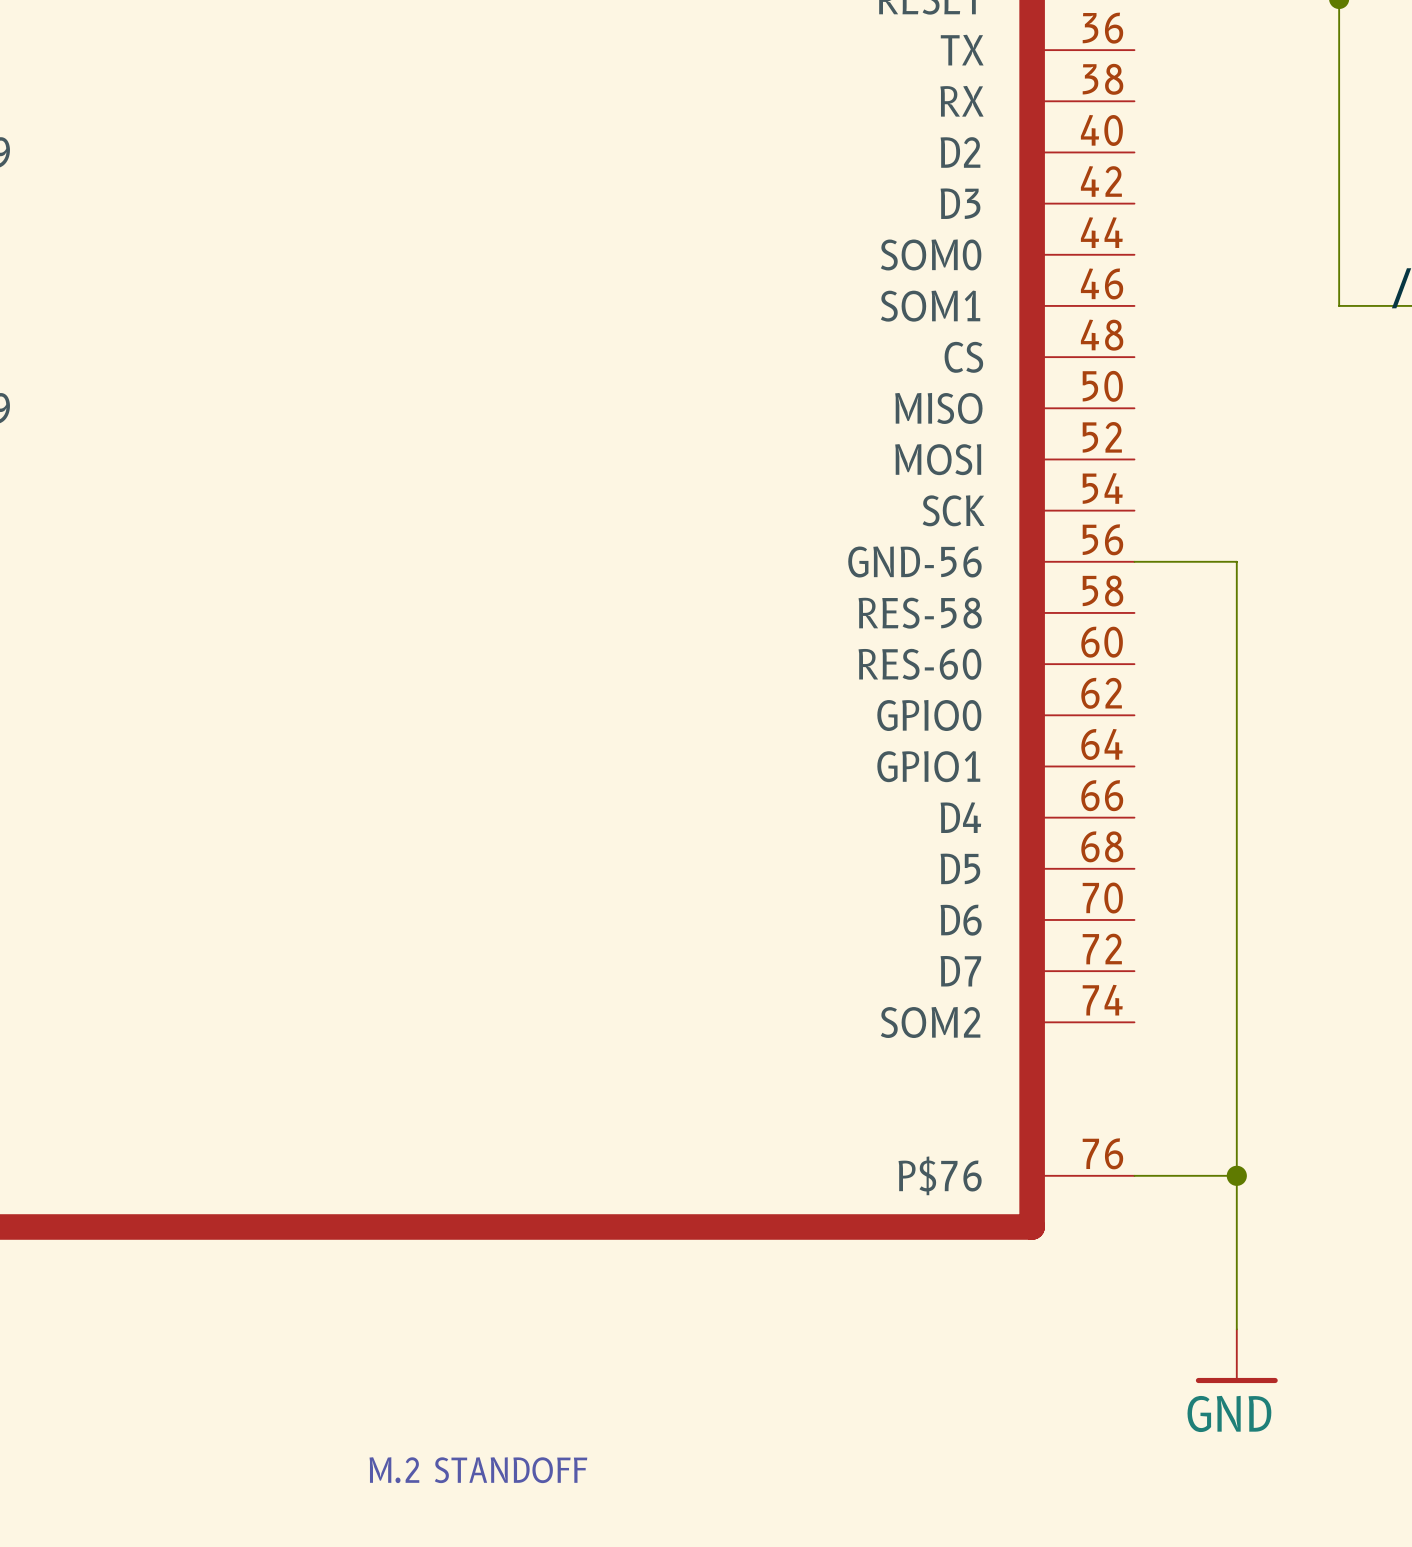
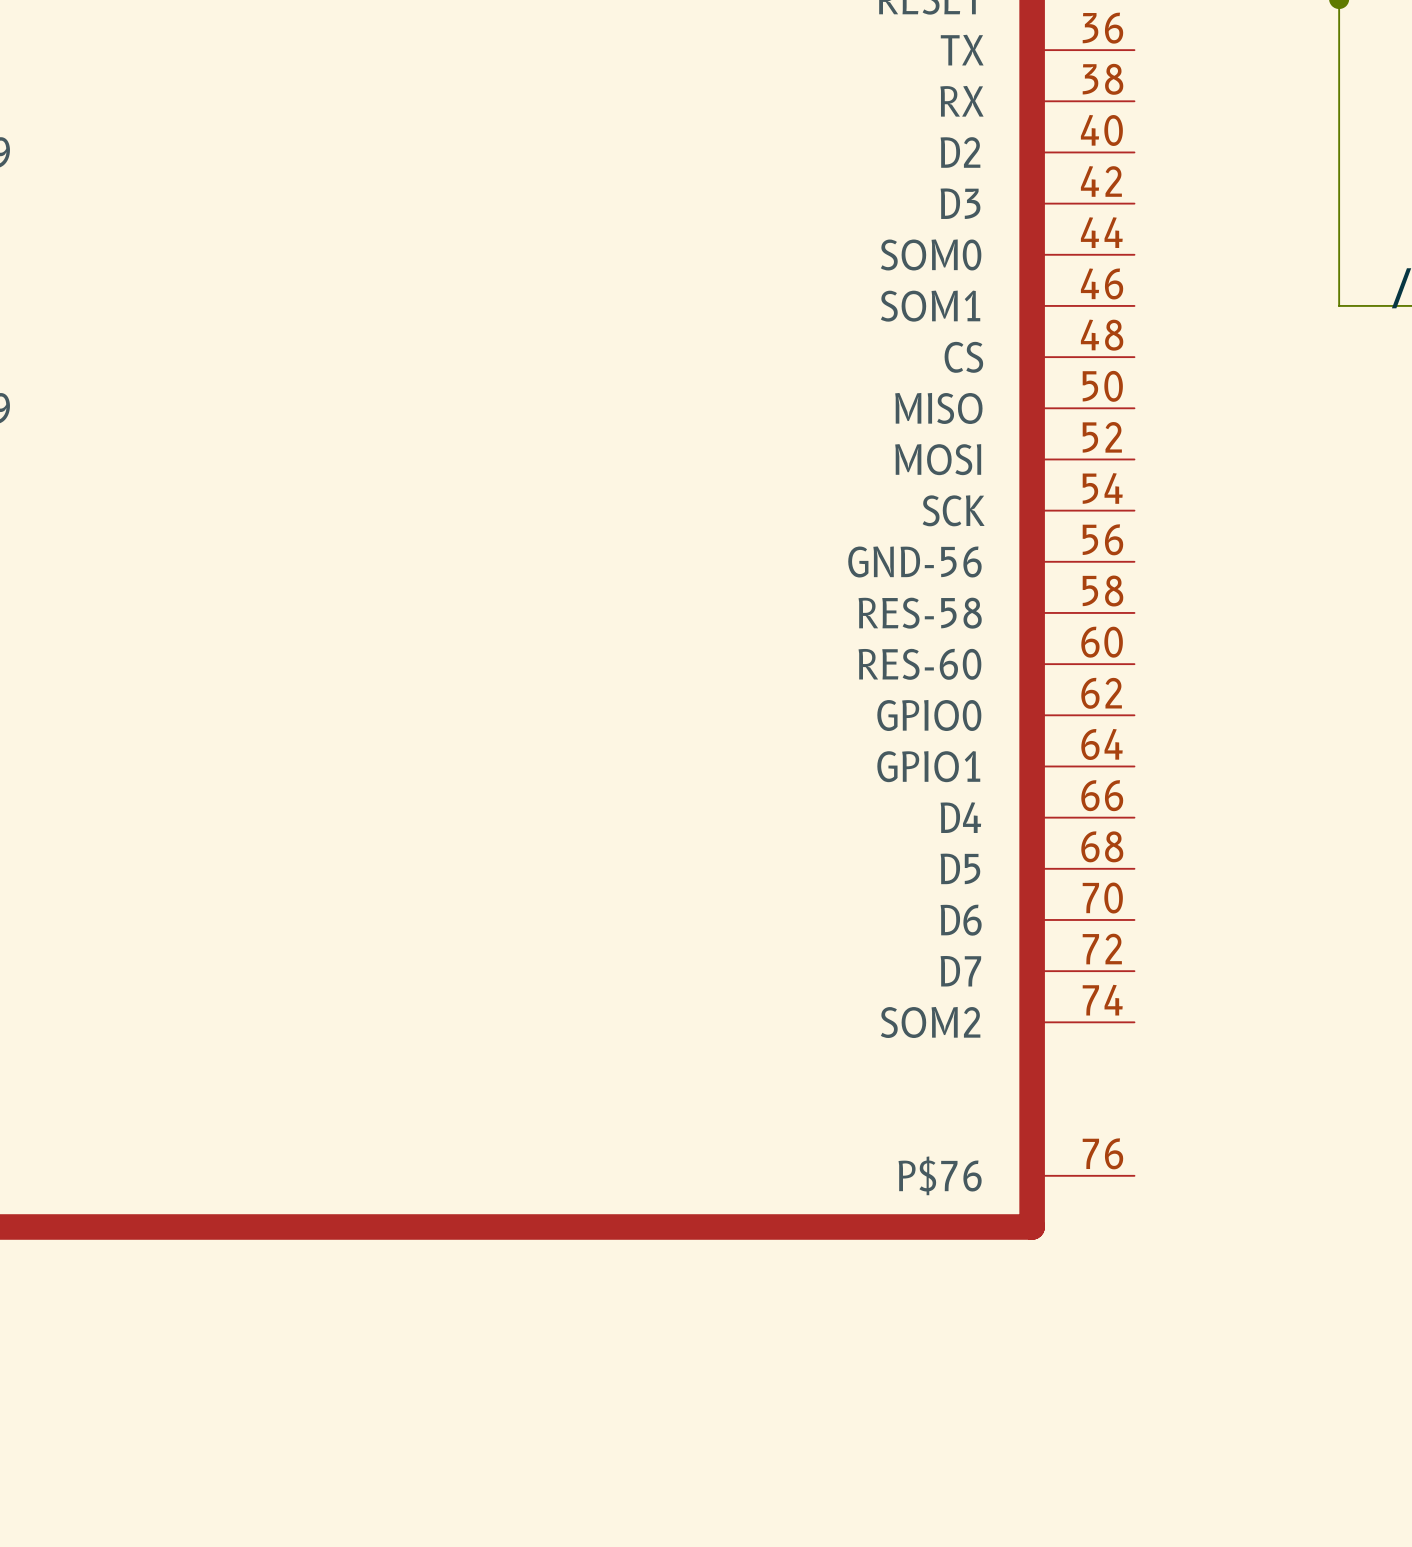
wire: (1134, 561) (1236, 561) (1236, 1329) -> none
wire: (1134, 1175) (1236, 1175) -> none
junction: (1236, 1175) -> none
power symbol: GND (1236, 1356) -> none
part: (478, 1470) -> none

